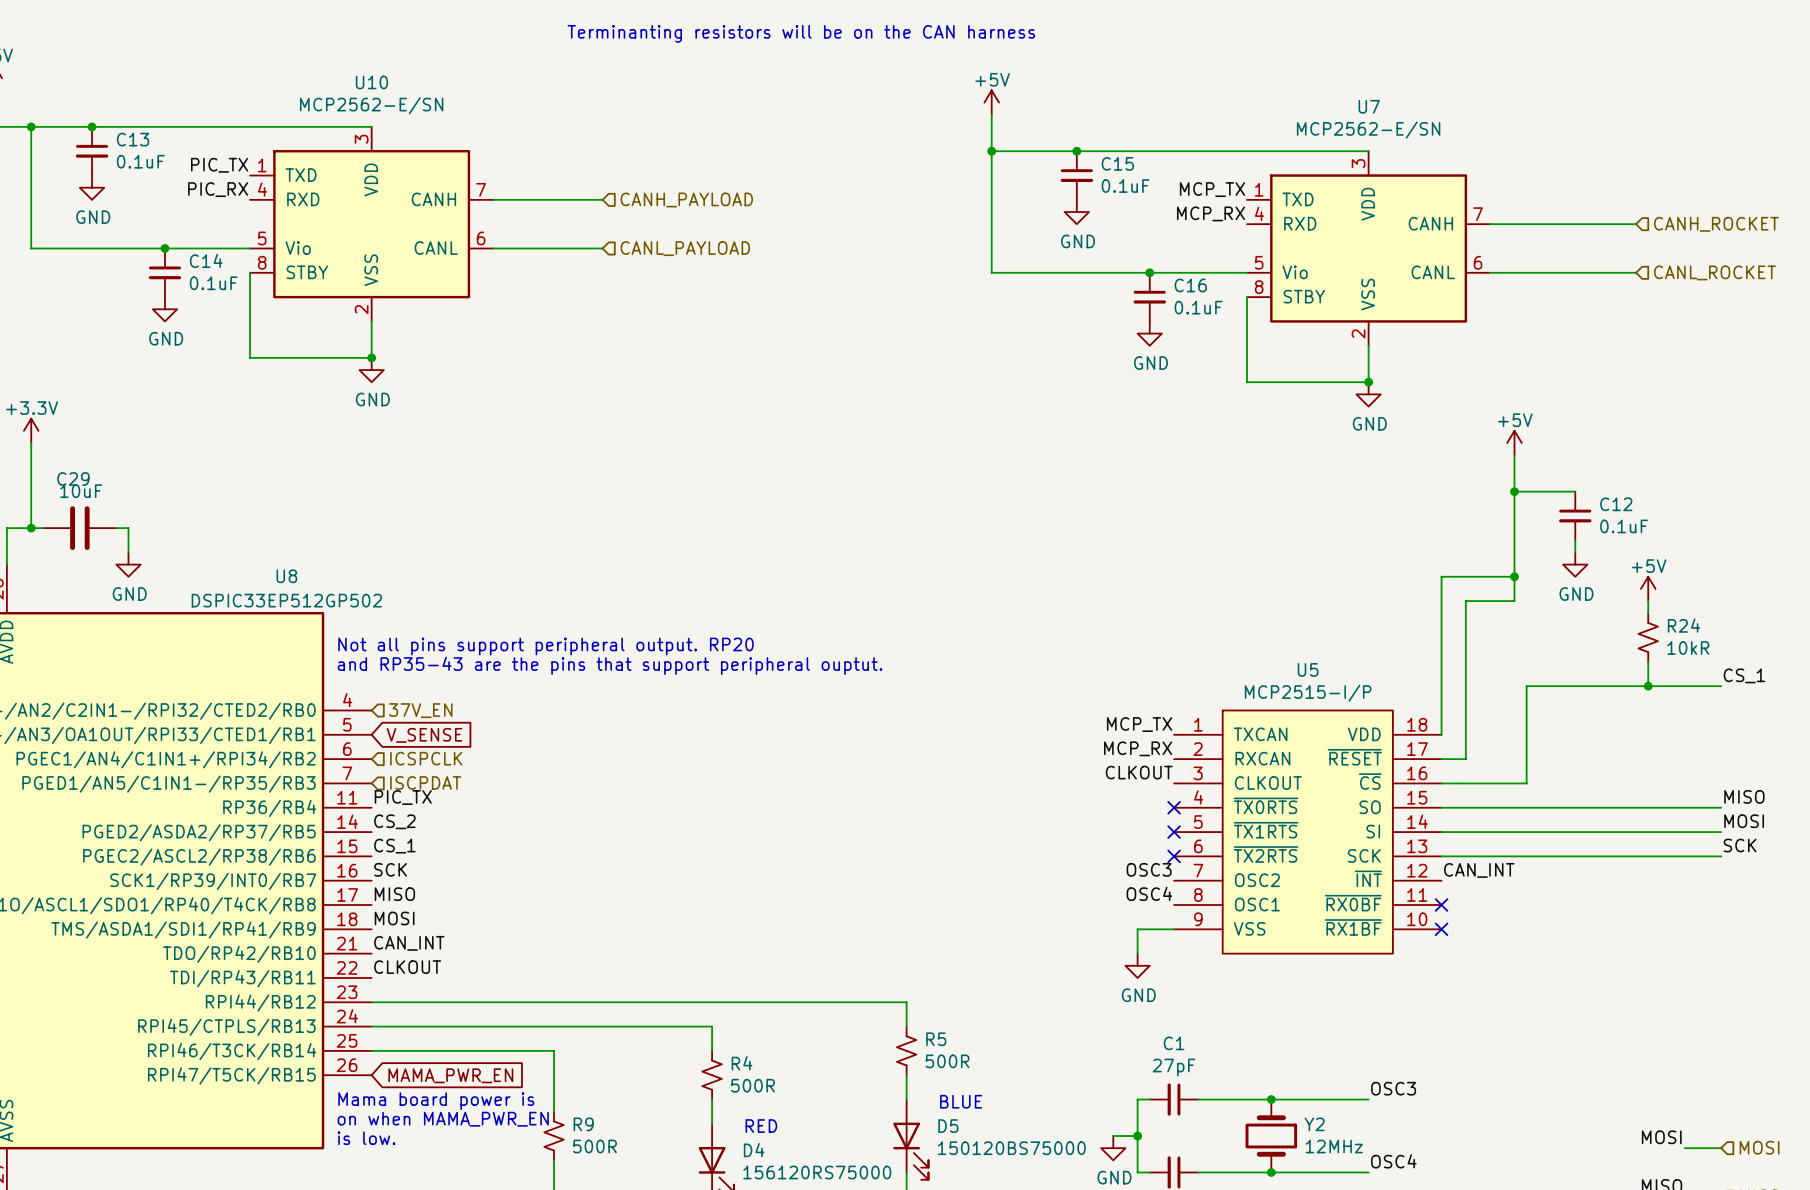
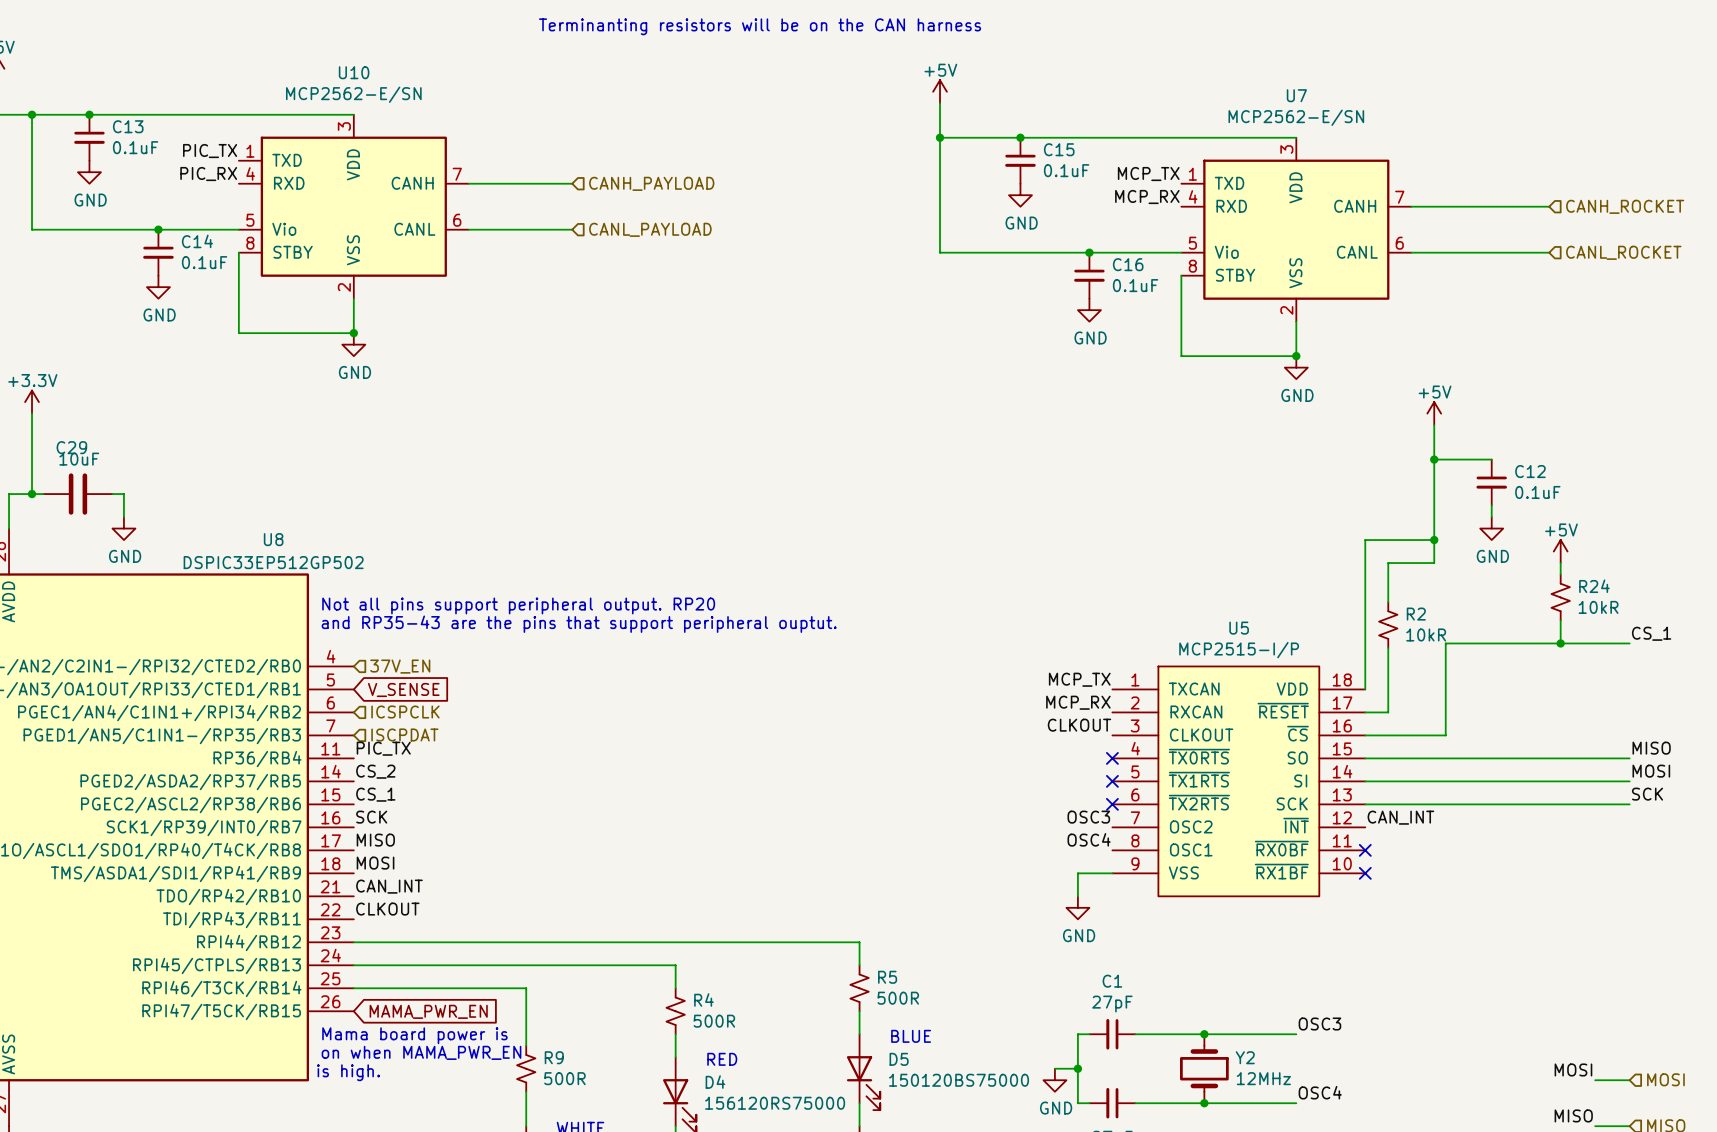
R2: none -> 10kR (1388, 625)
text: is low. (366, 1138) -> is high. (348, 1072)

